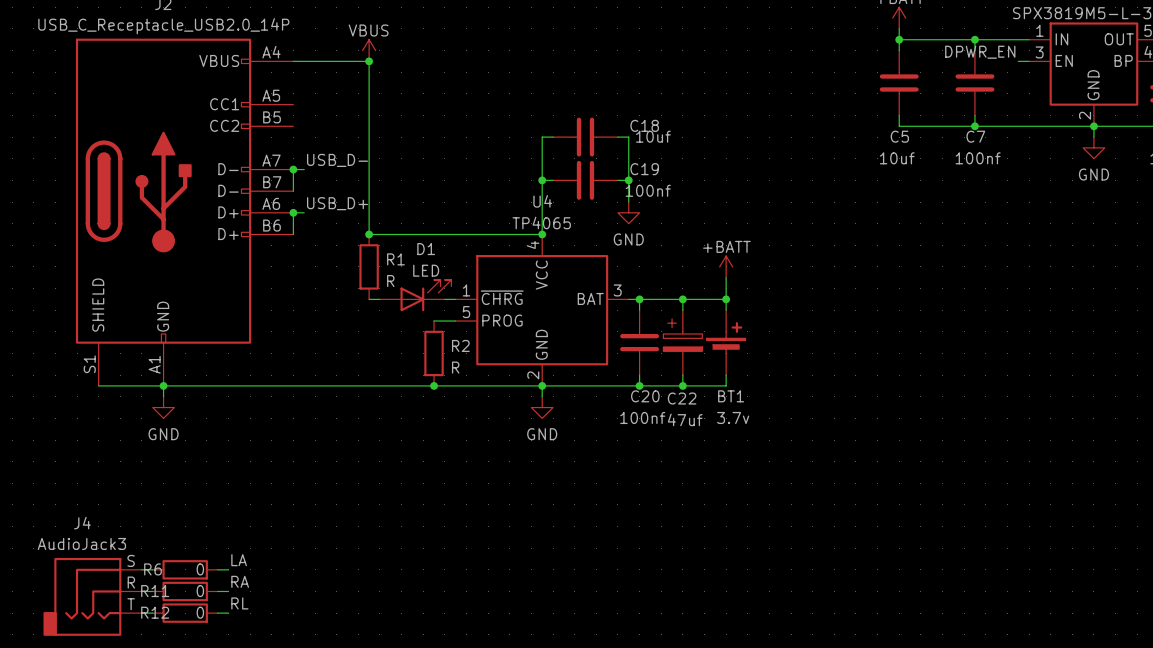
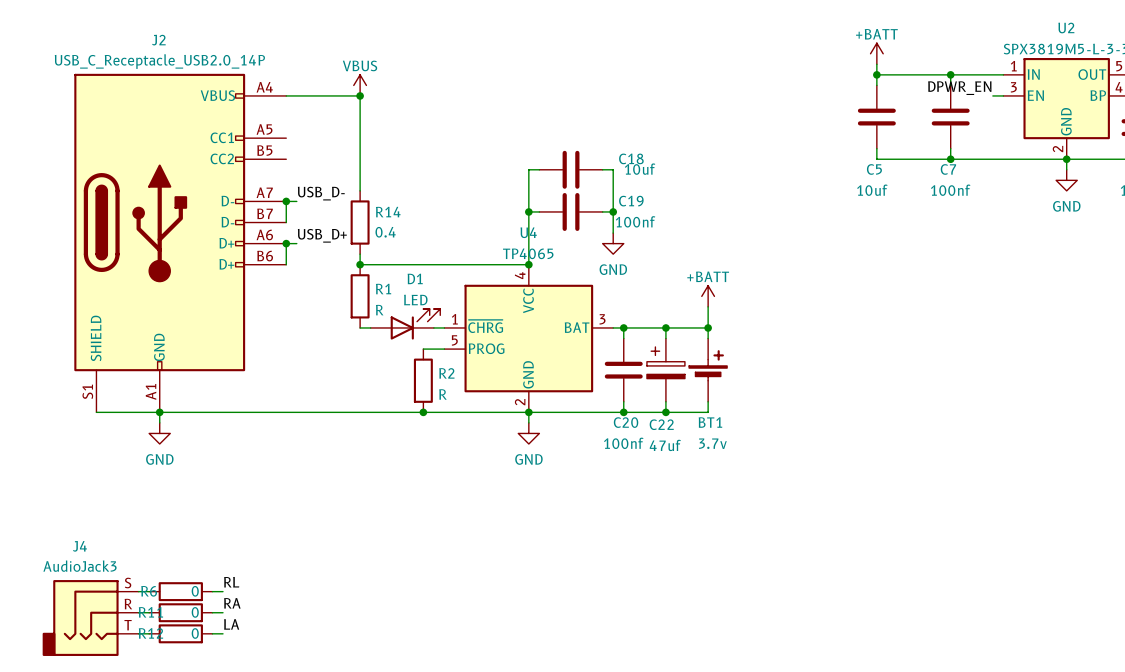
wire: (369, 158) (369, 223) -> none
R14: none -> 0.4 (360, 222)
label: LA (239, 560) -> RL (231, 582)
label: RL (239, 603) -> LA (231, 624)

